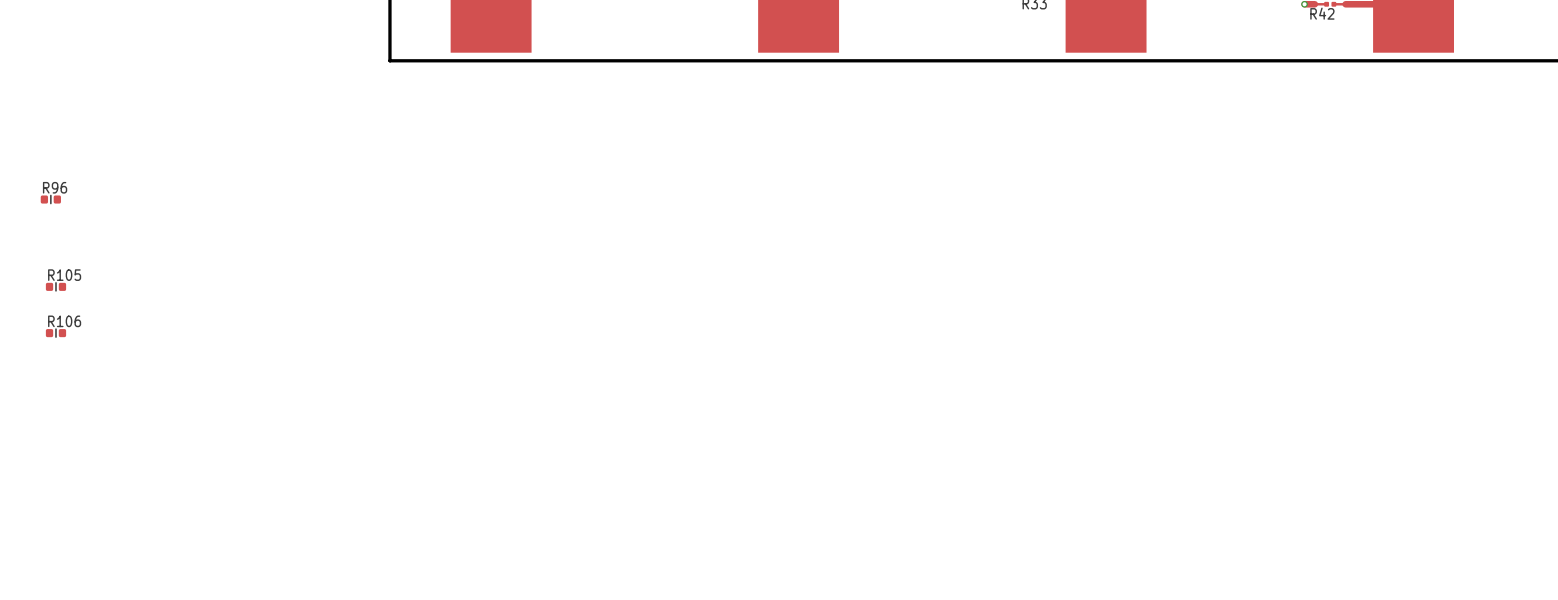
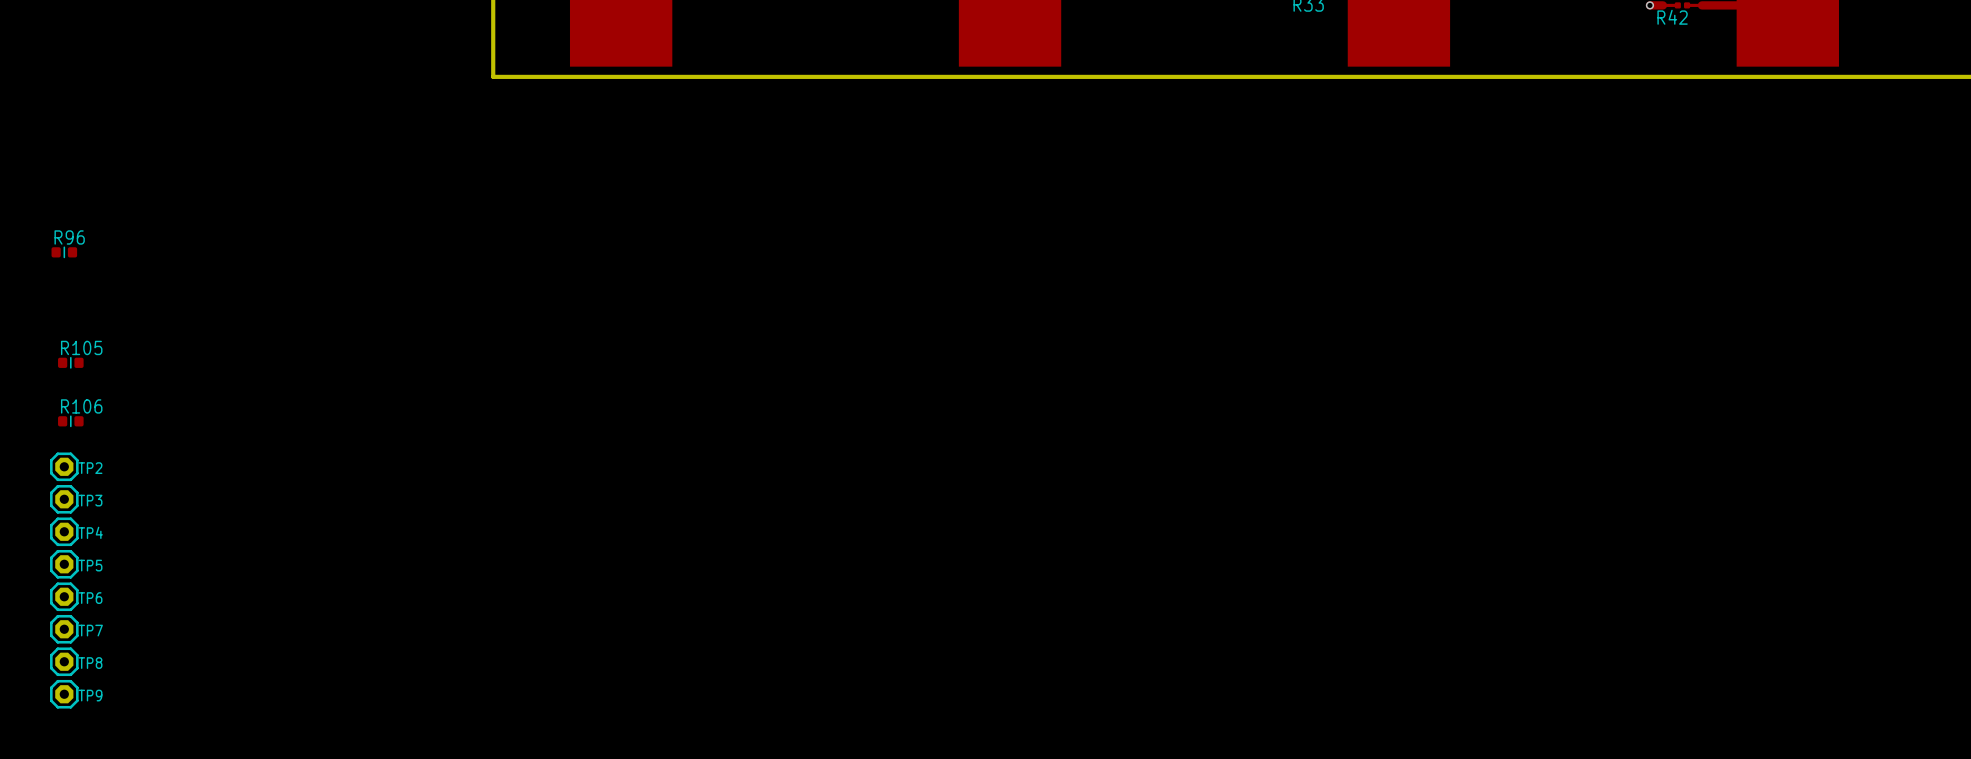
TP2: none -> (64, 466)
TP3: none -> (64, 499)
TP4: none -> (64, 531)
TP5: none -> (64, 564)
TP6: none -> (64, 596)
TP7: none -> (64, 629)
TP8: none -> (64, 661)
TP9: none -> (64, 694)

